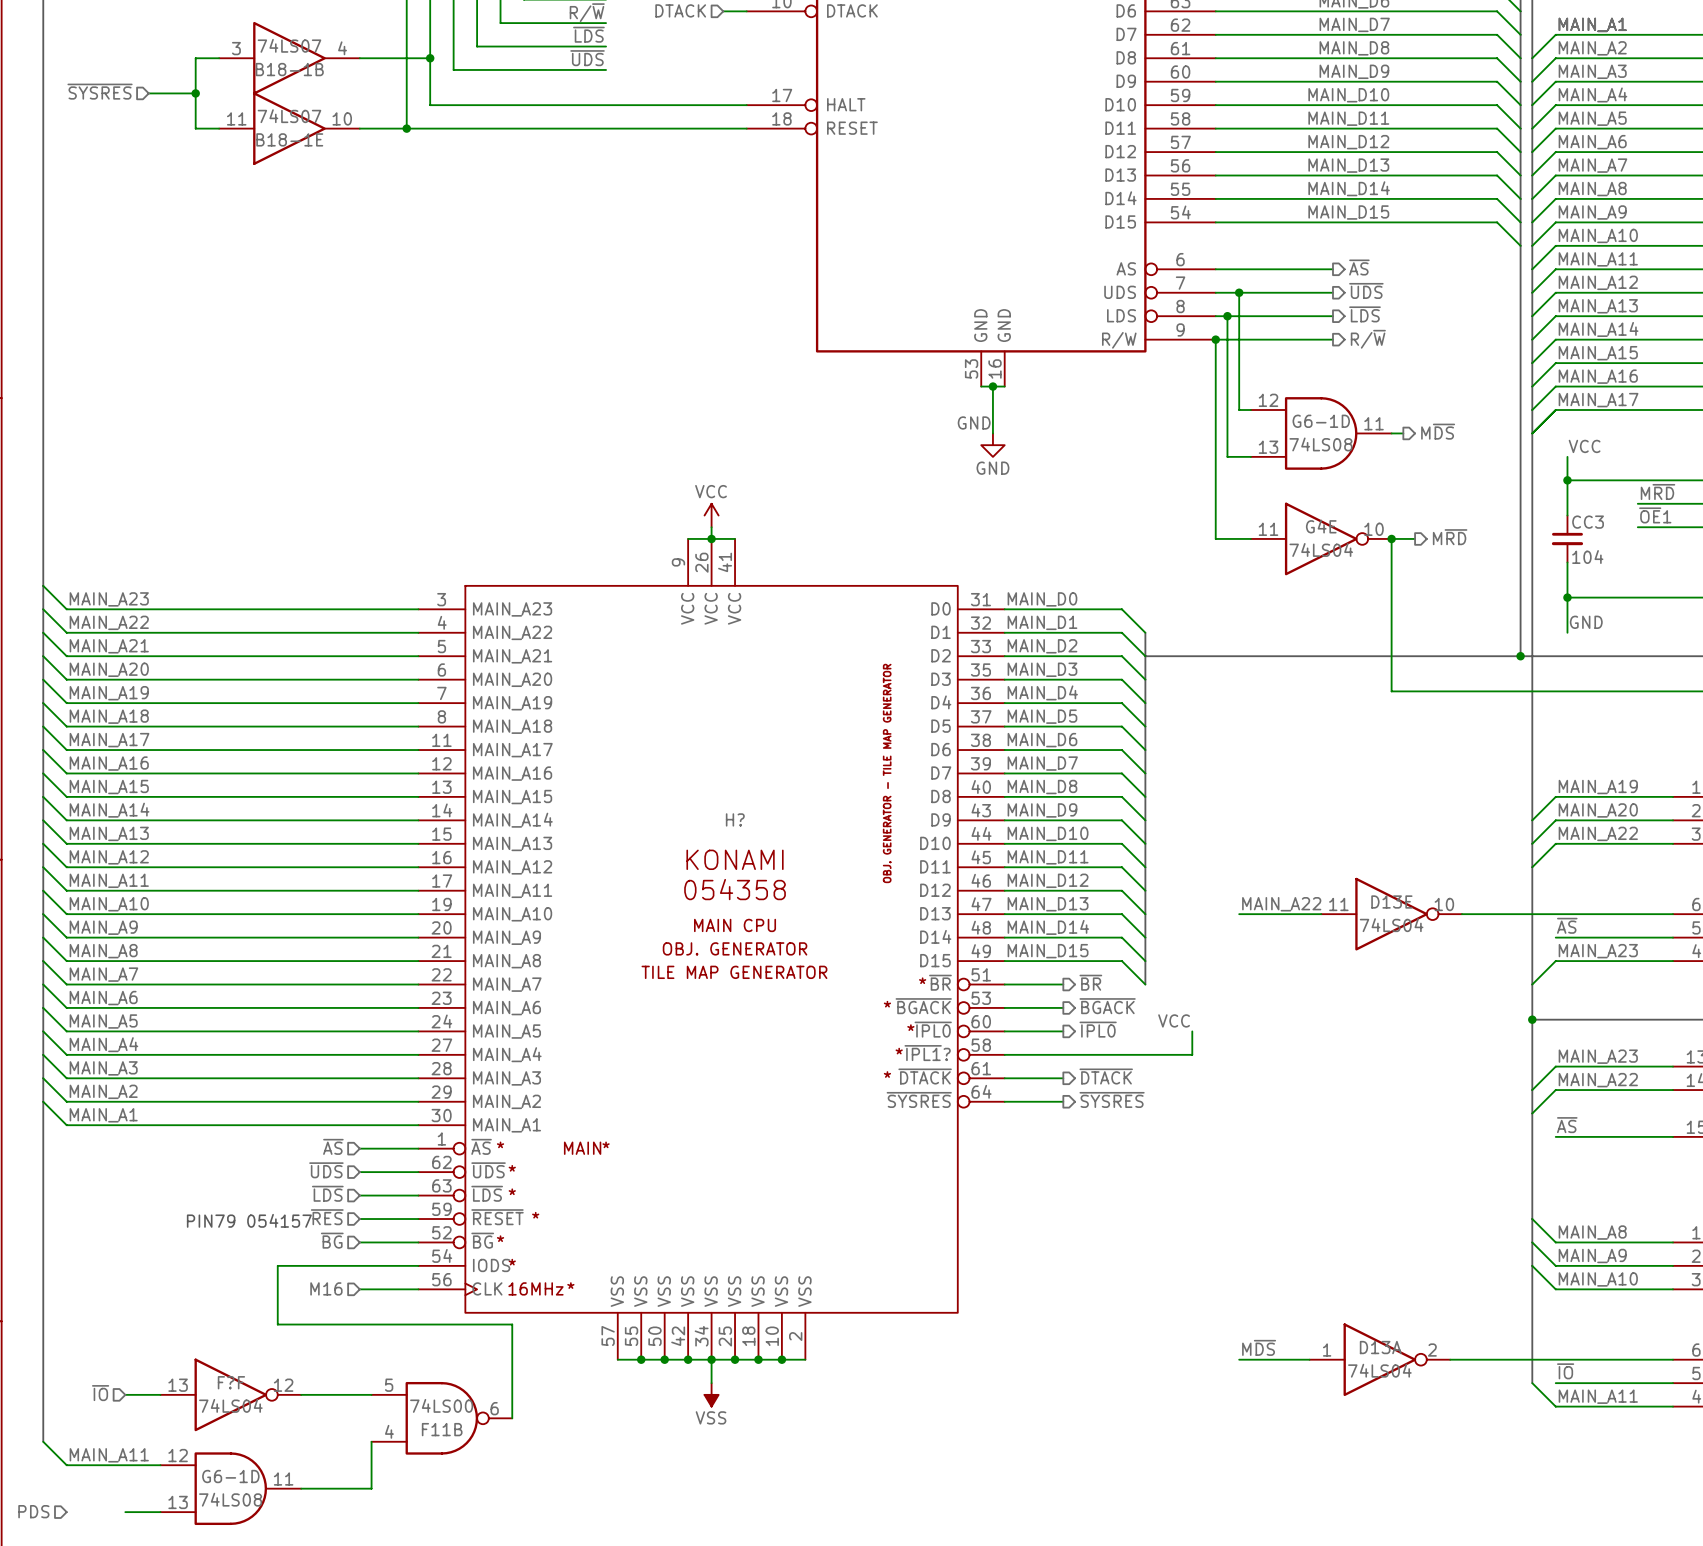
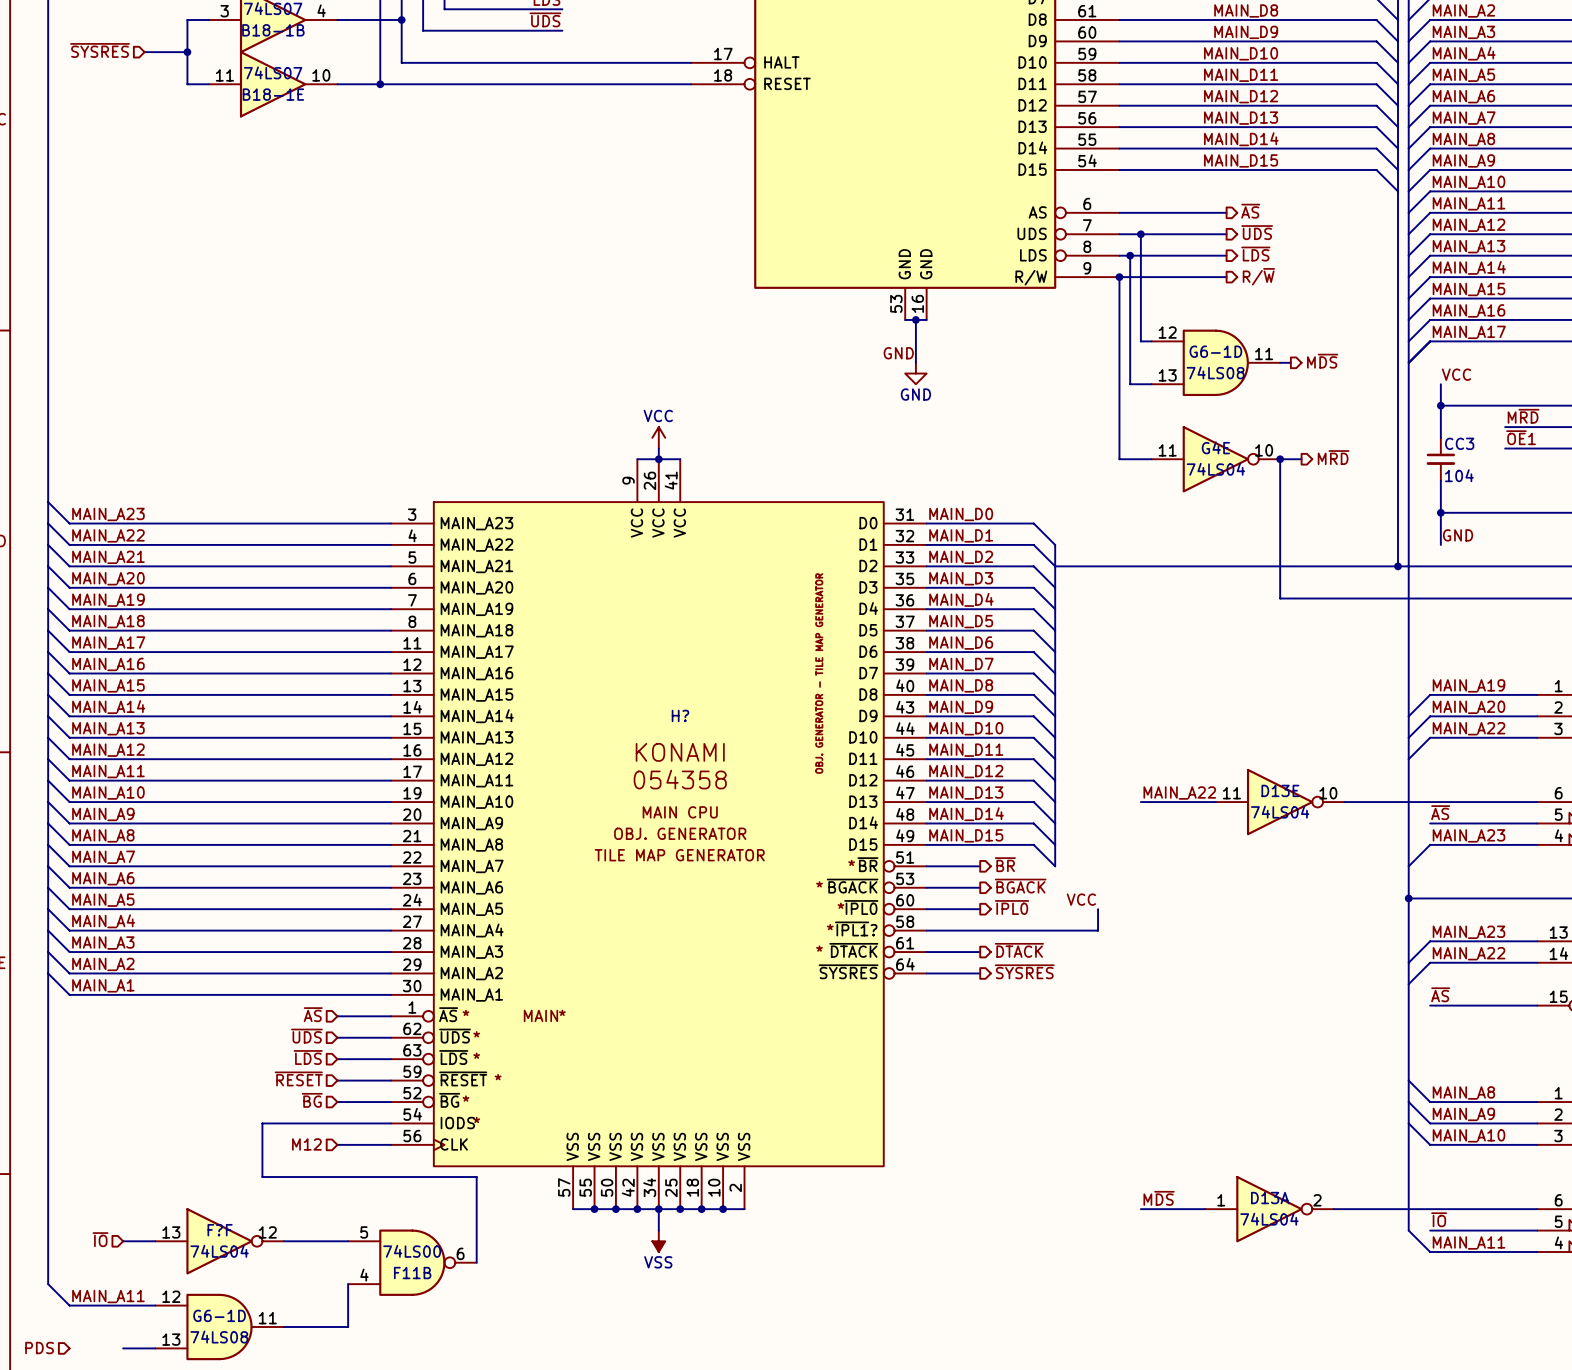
hierarchical label: ~{RES} (327, 1217) -> ~{RESET} (298, 1078)
text: PIN79 054157 (249, 1220) -> none
H? text: * (570, 1285) -> none
hierarchical label: M16 (326, 1288) -> M12 (306, 1144)
H? text: 16MHz (535, 1288) -> none

